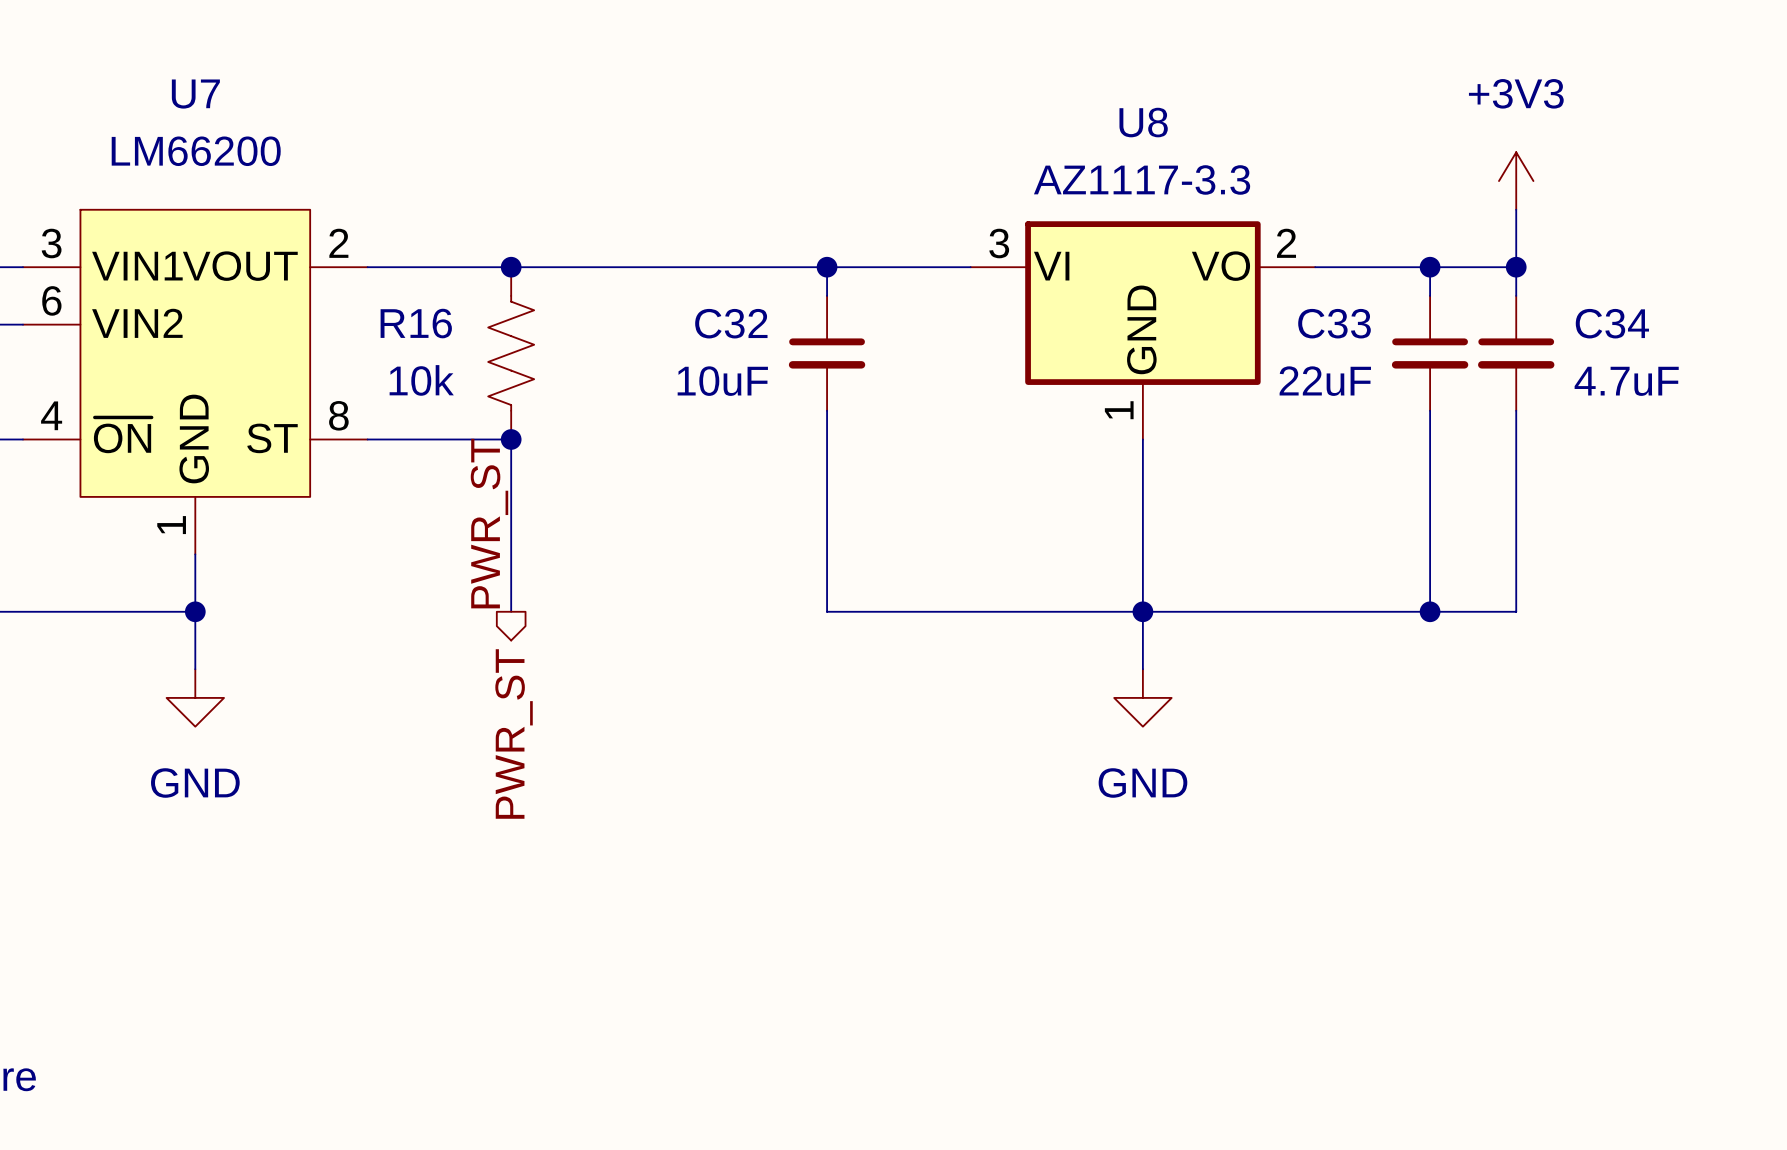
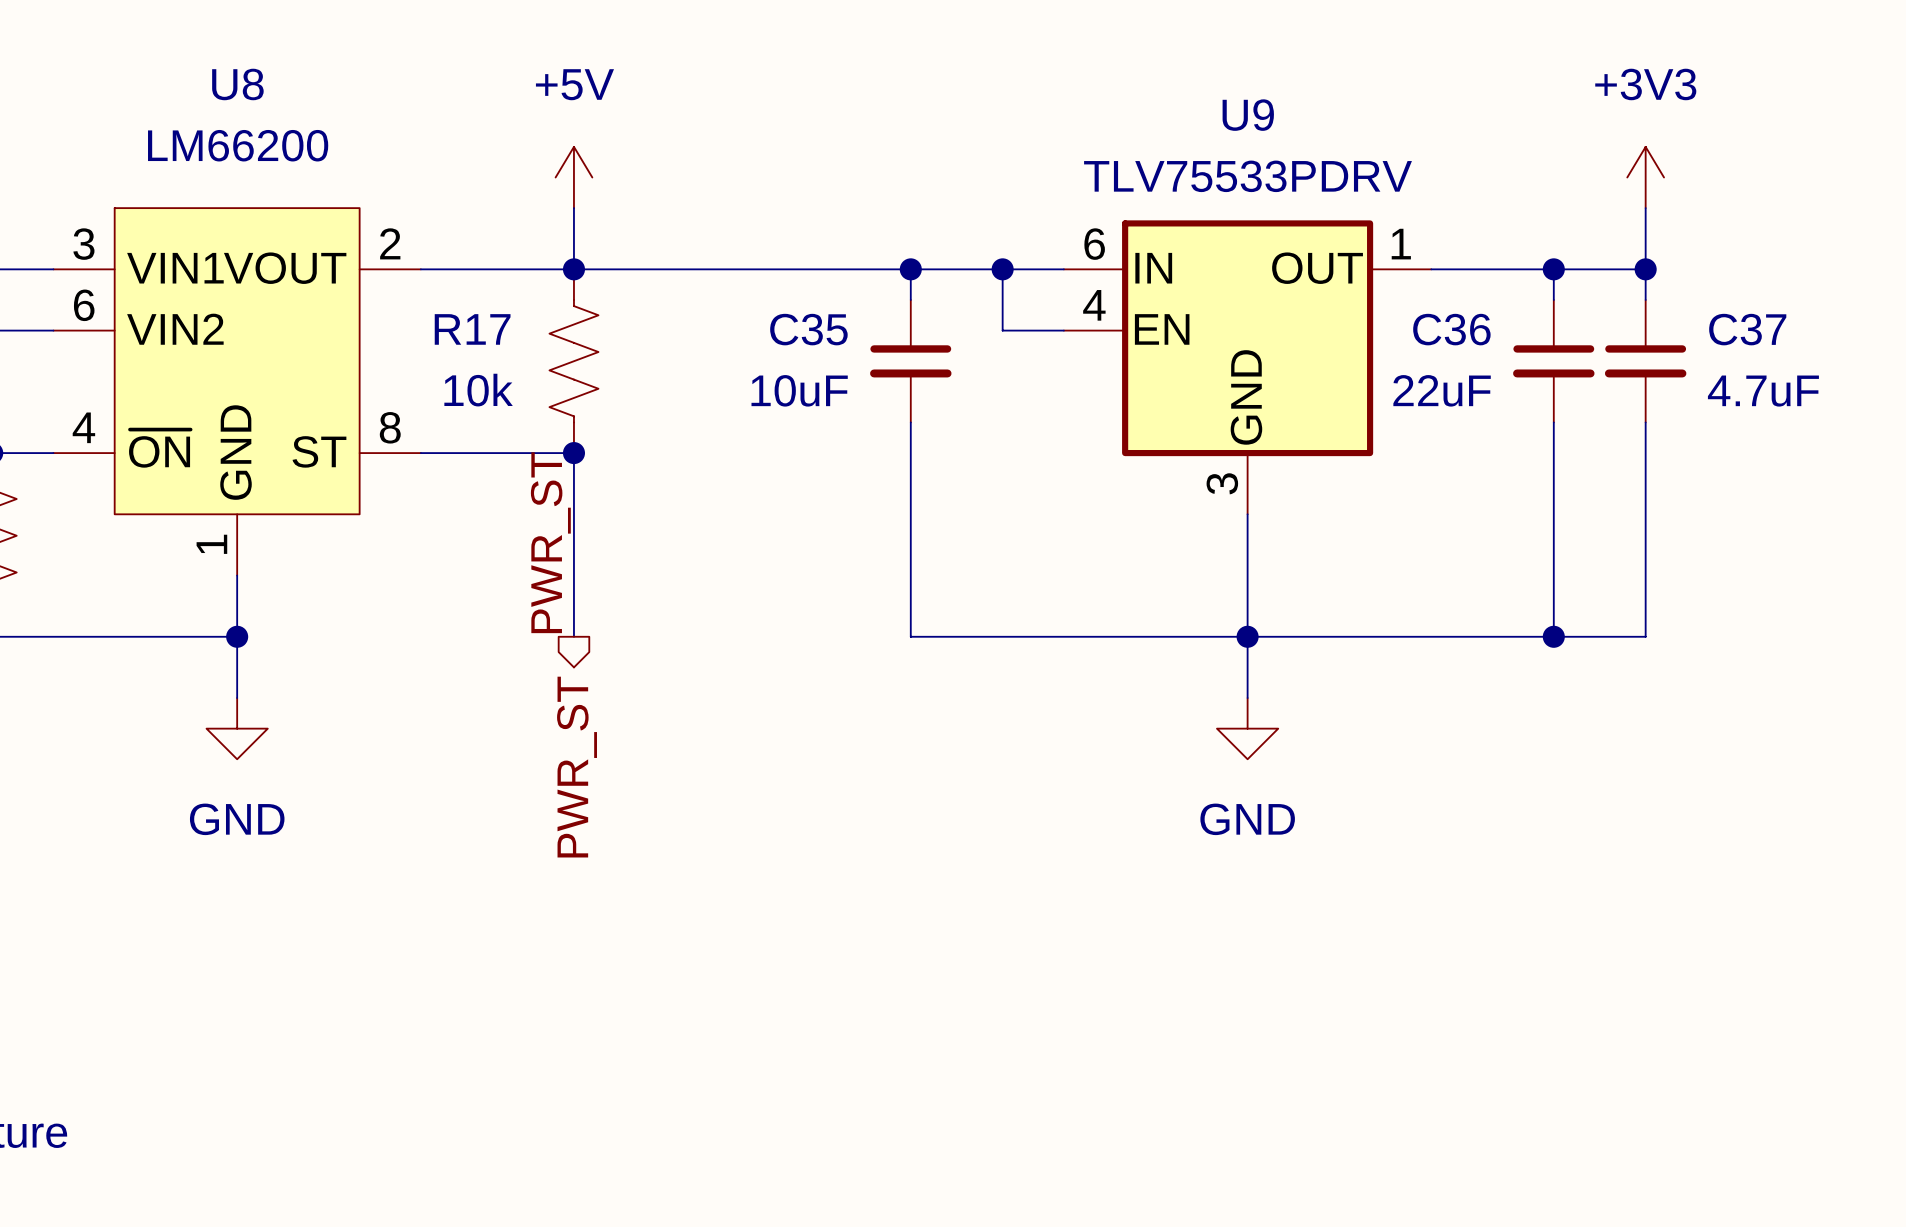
U7 name: U7 (195, 94) -> U8 (237, 84)
power symbol: none -> +5V (573, 177)
wire: none -> (573, 208) (573, 269)
wire: none -> (1002, 269) (1002, 330) (1063, 330)
junction: none -> (1002, 269)
R16 name: R16 (416, 323) -> R17 (472, 329)
C32 name: C32 (731, 323) -> C35 (808, 329)
C33 name: C33 (1334, 323) -> C36 (1451, 329)
C34 name: C34 (1612, 323) -> C37 (1747, 329)
U8: AZ1117-3.3 (1142, 330) -> none
U9: none -> TLV75533PDRV (1247, 367)

